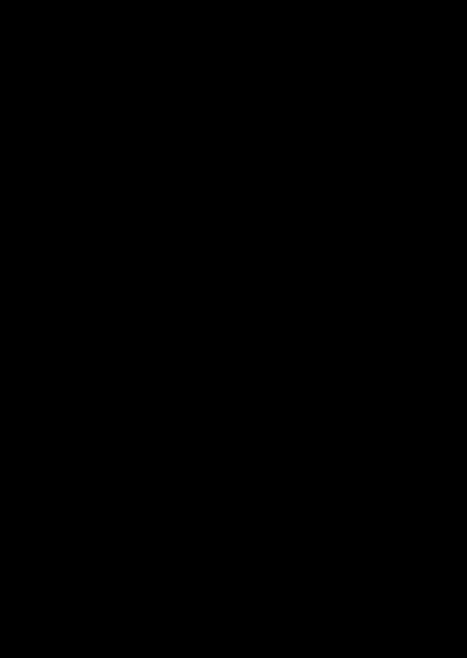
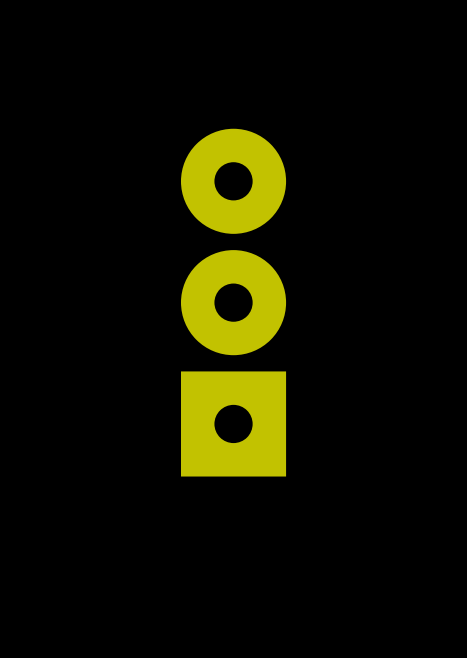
part: none -> (233, 302)

